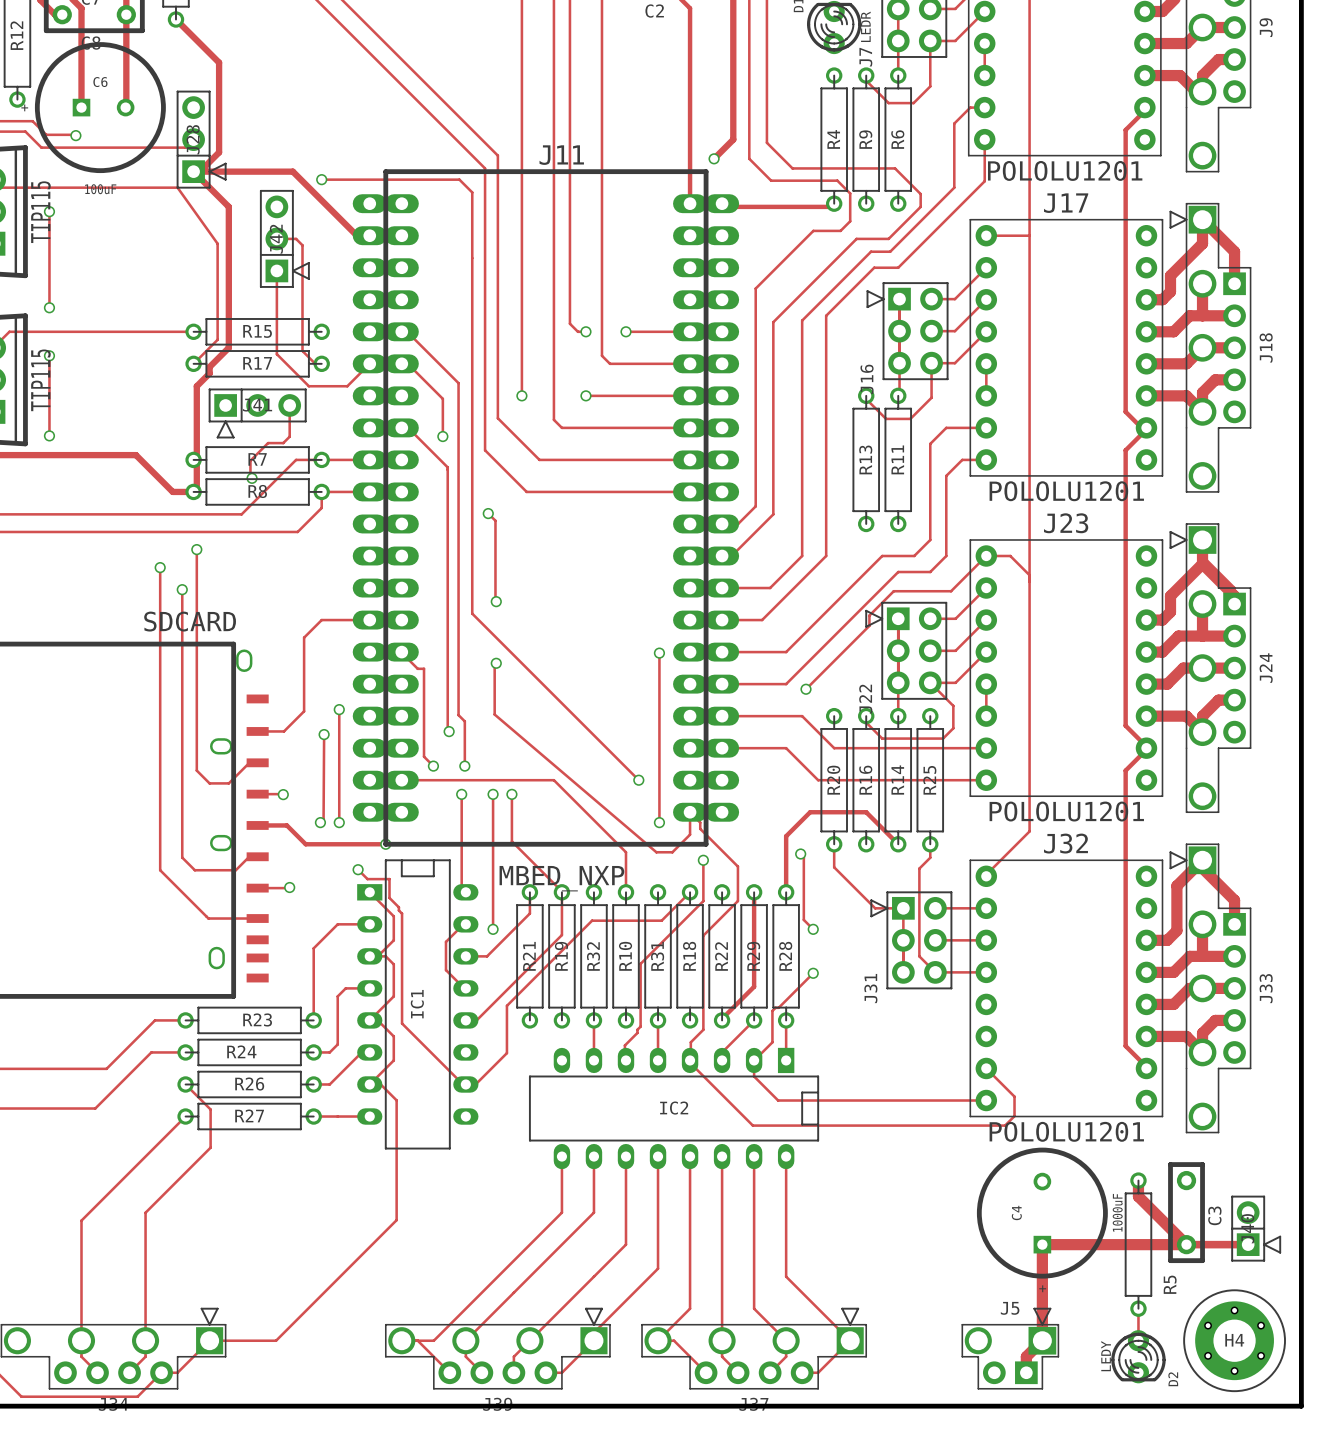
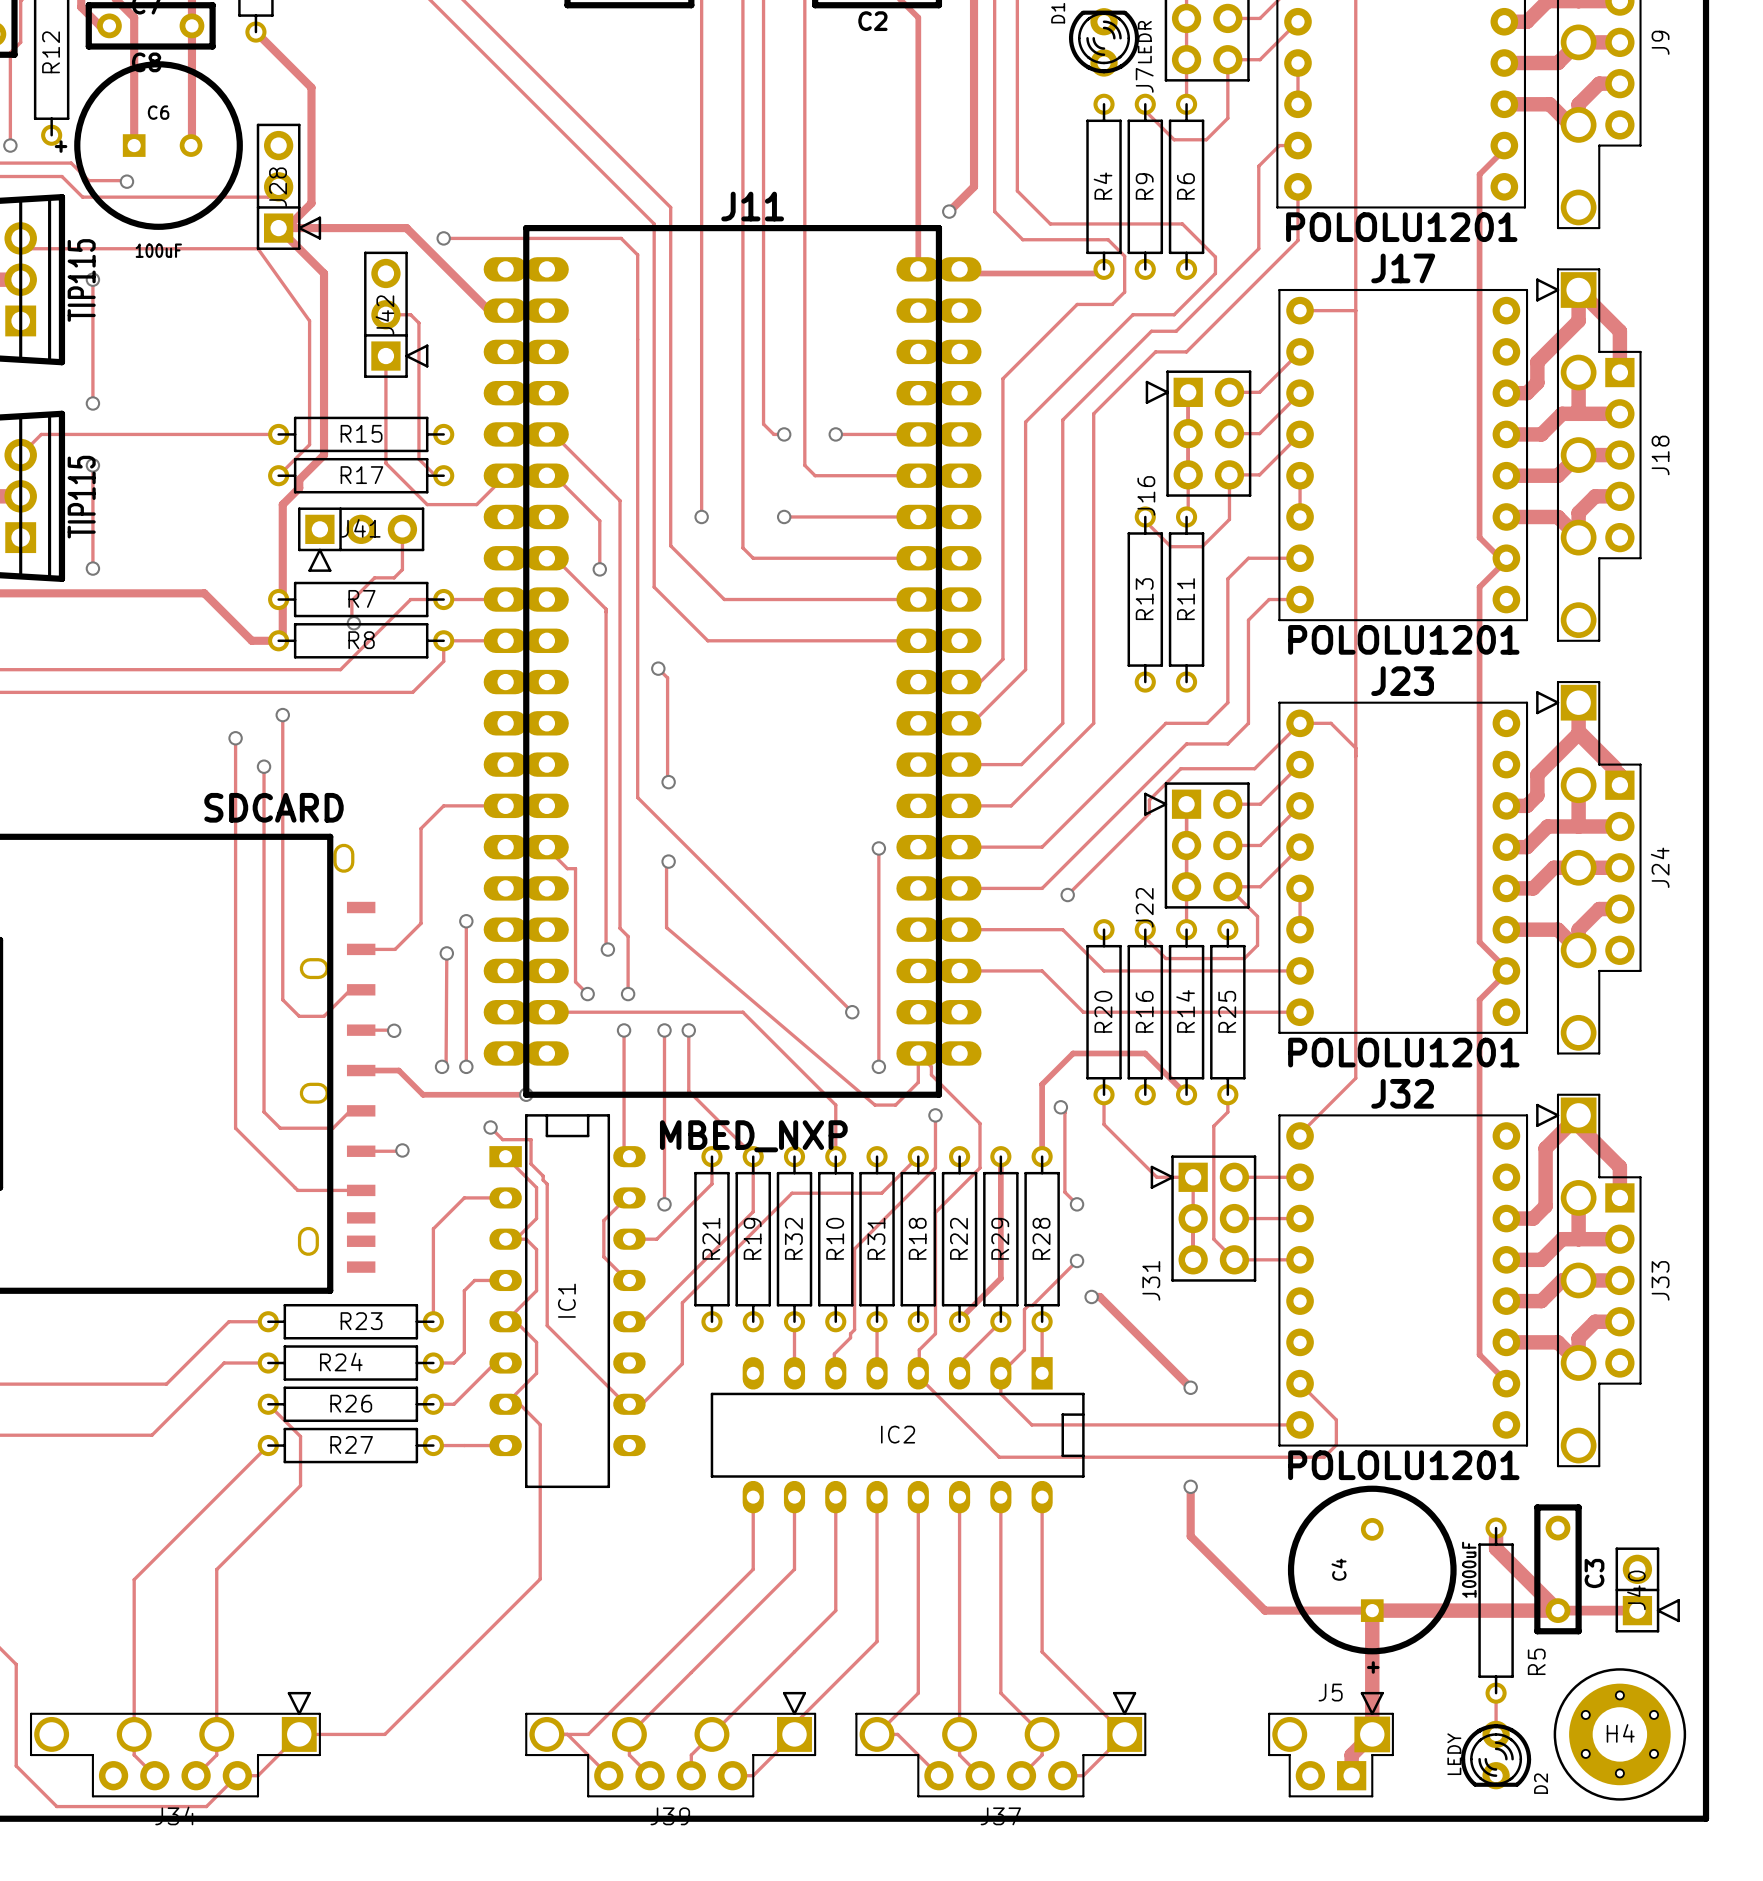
track: none -> (1091, 1296) (1099, 1296) (1190, 1387)
via: none -> (1091, 1296)
via: none -> (1190, 1387)
track: none -> (1190, 1486) (1190, 1536) (1264, 1610) (1372, 1610)
via: none -> (1190, 1486)

